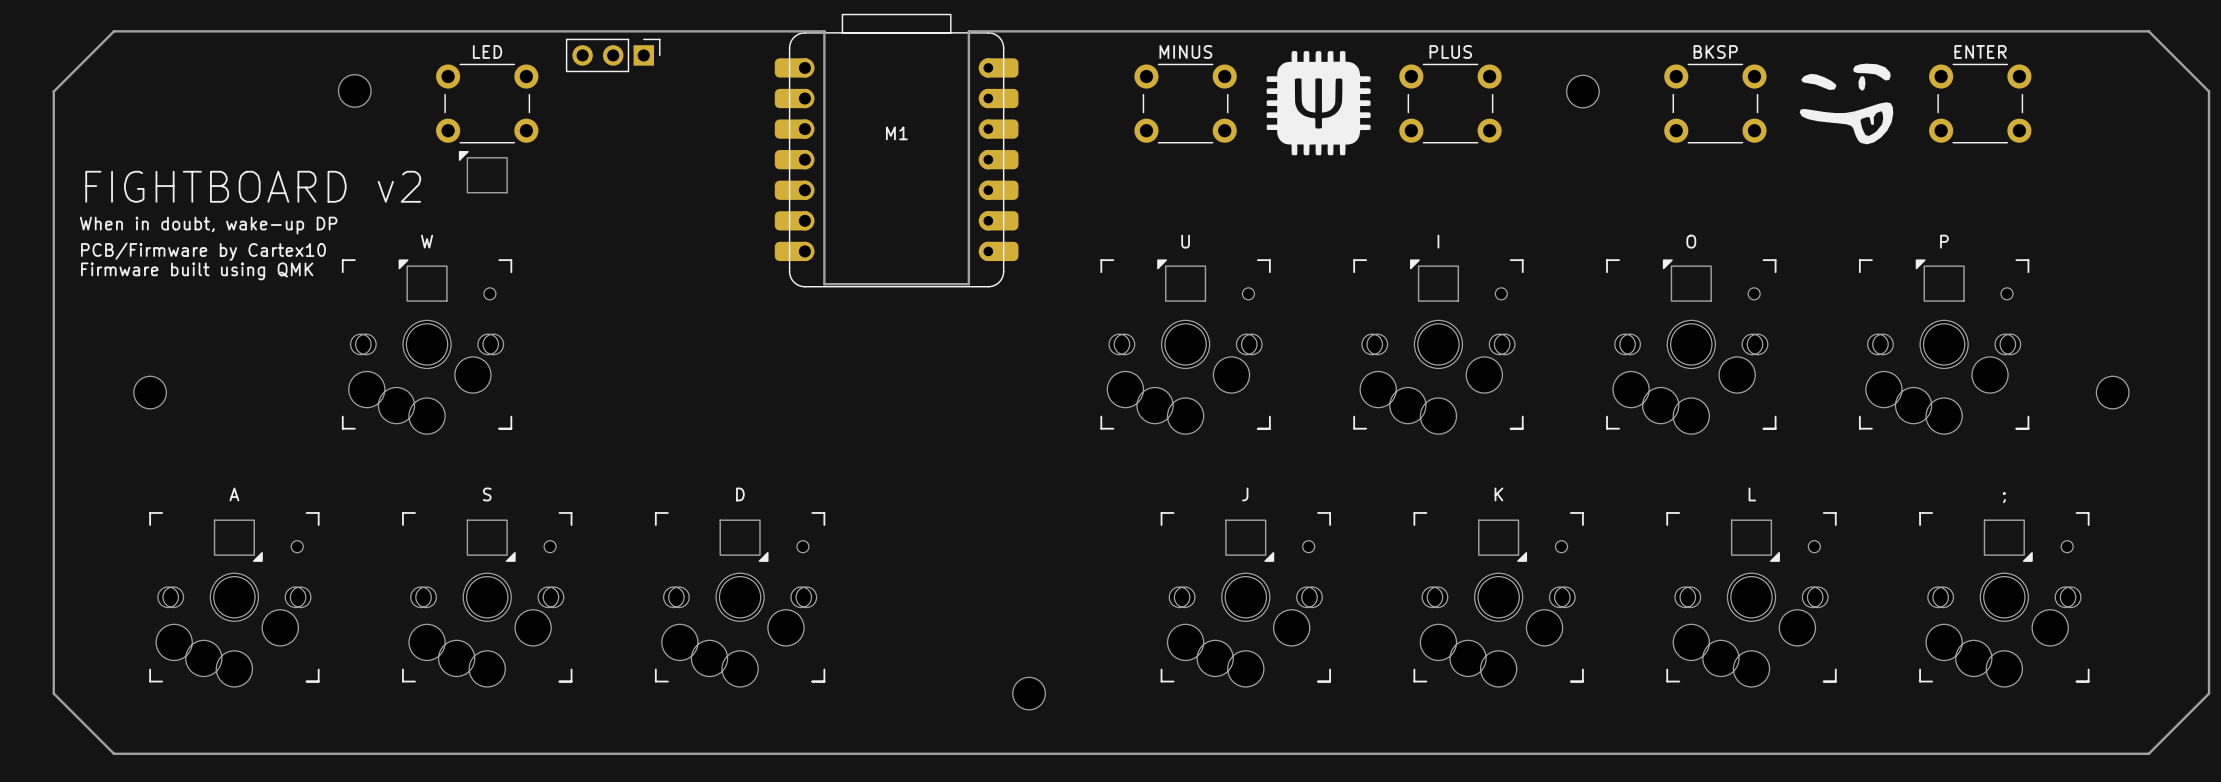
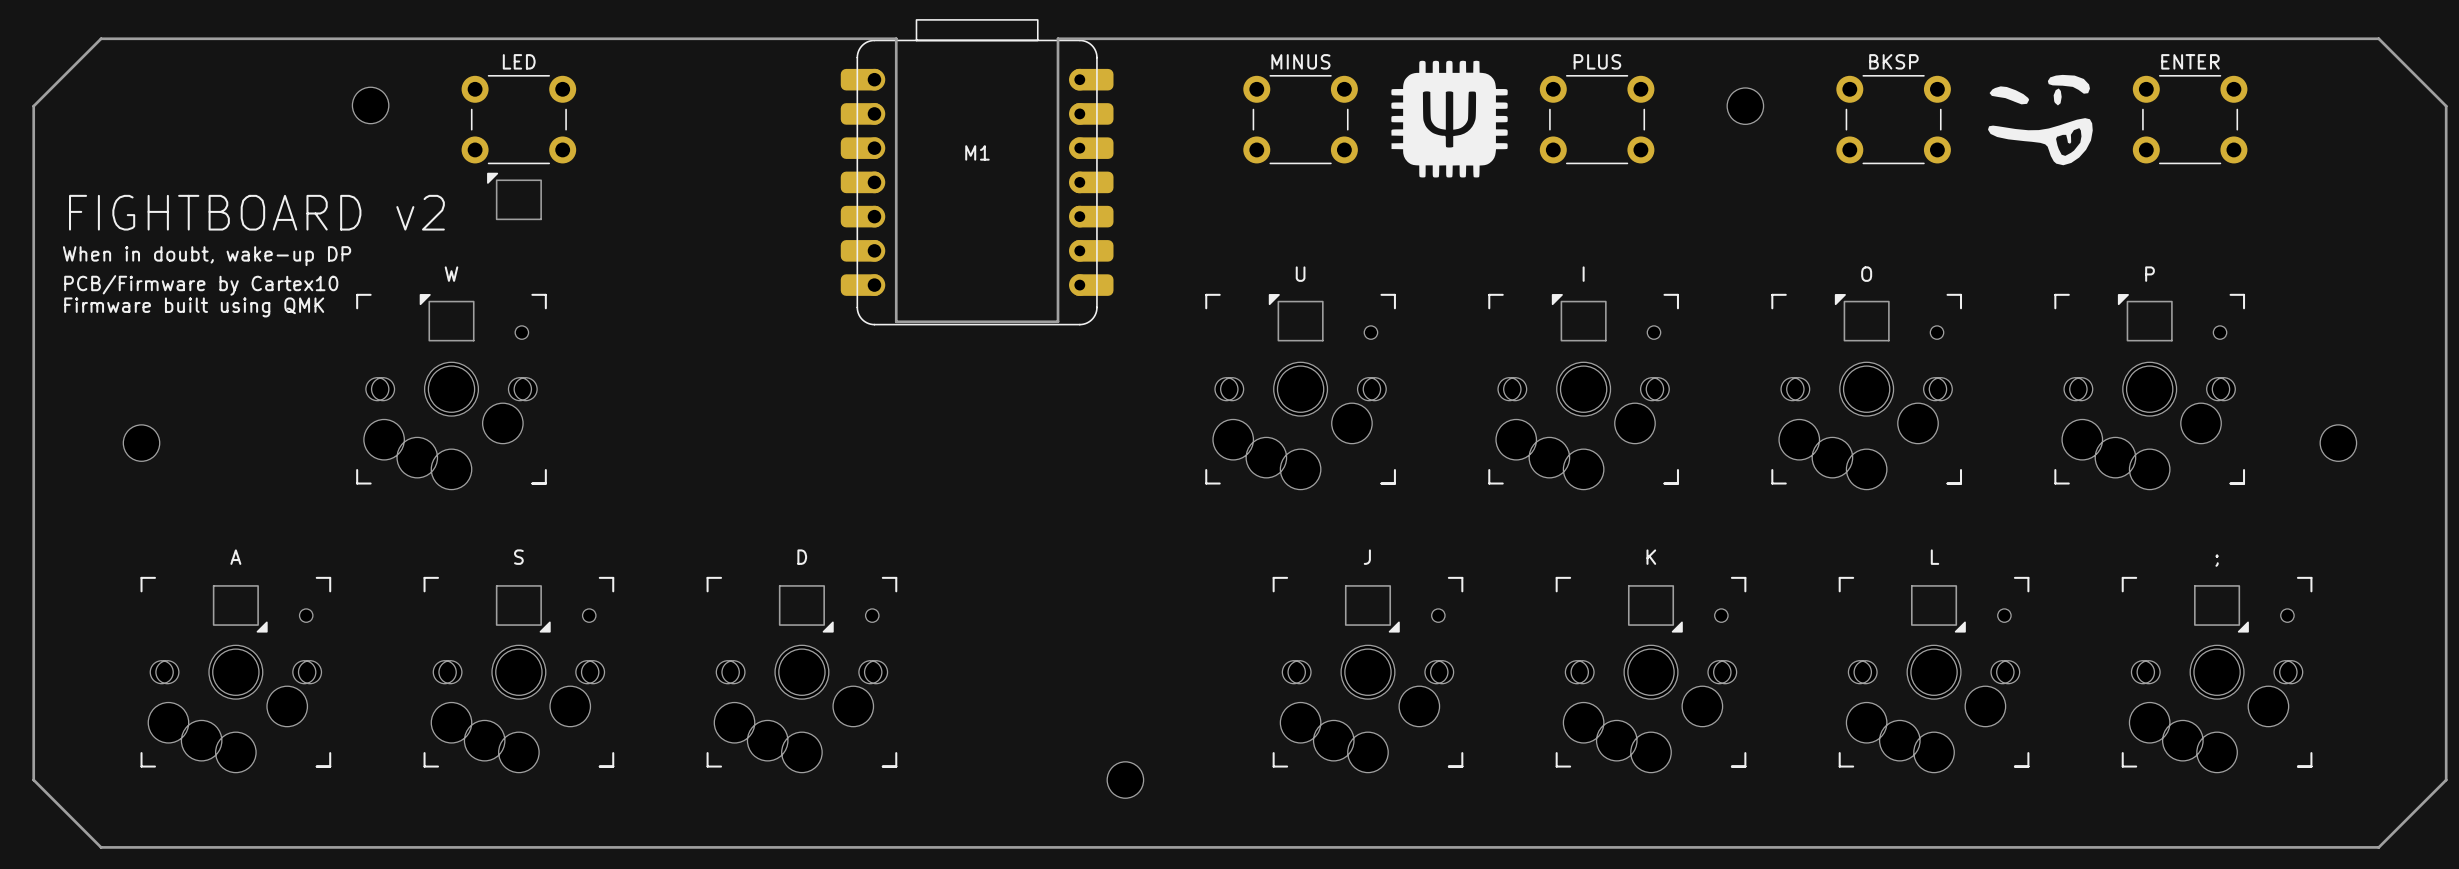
part: (613, 55) -> none

